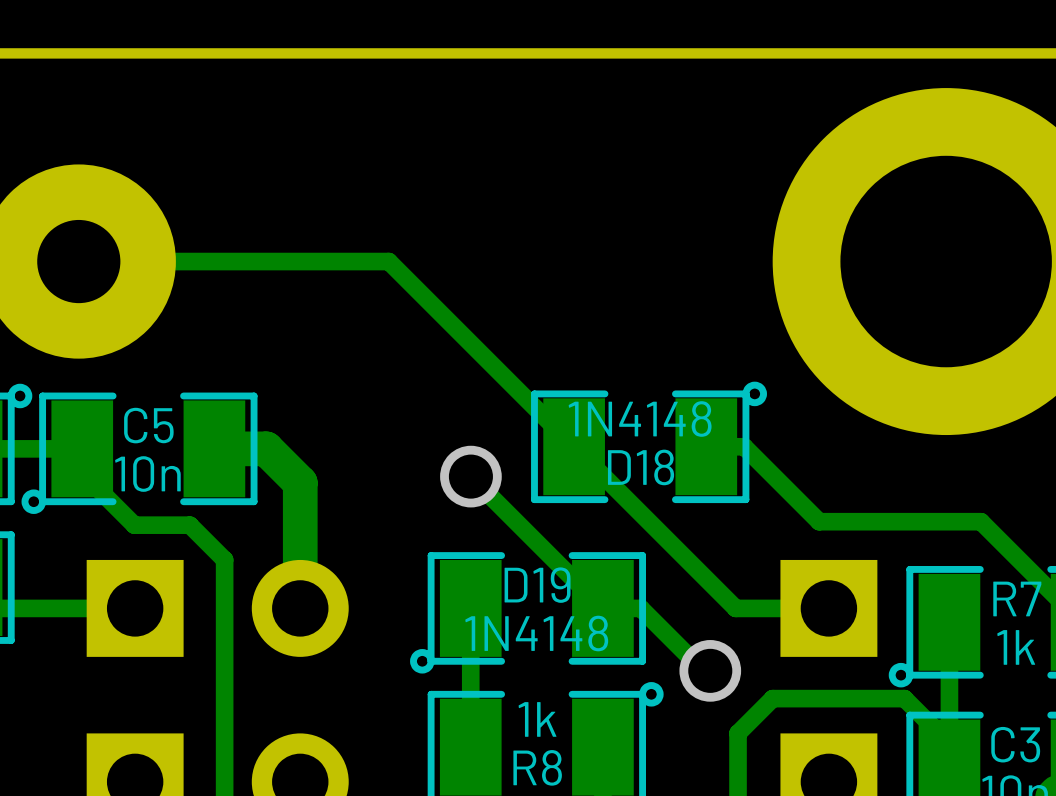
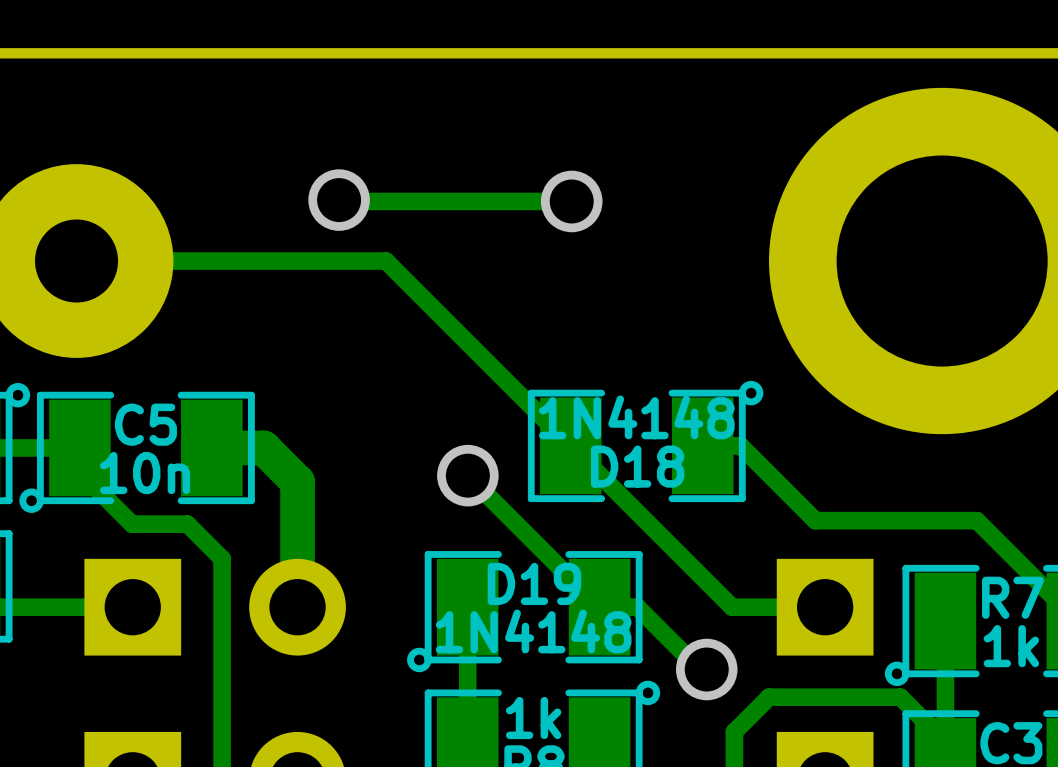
track: none -> (339, 200) (571, 201)
via: none -> (339, 200)
via: none -> (571, 201)

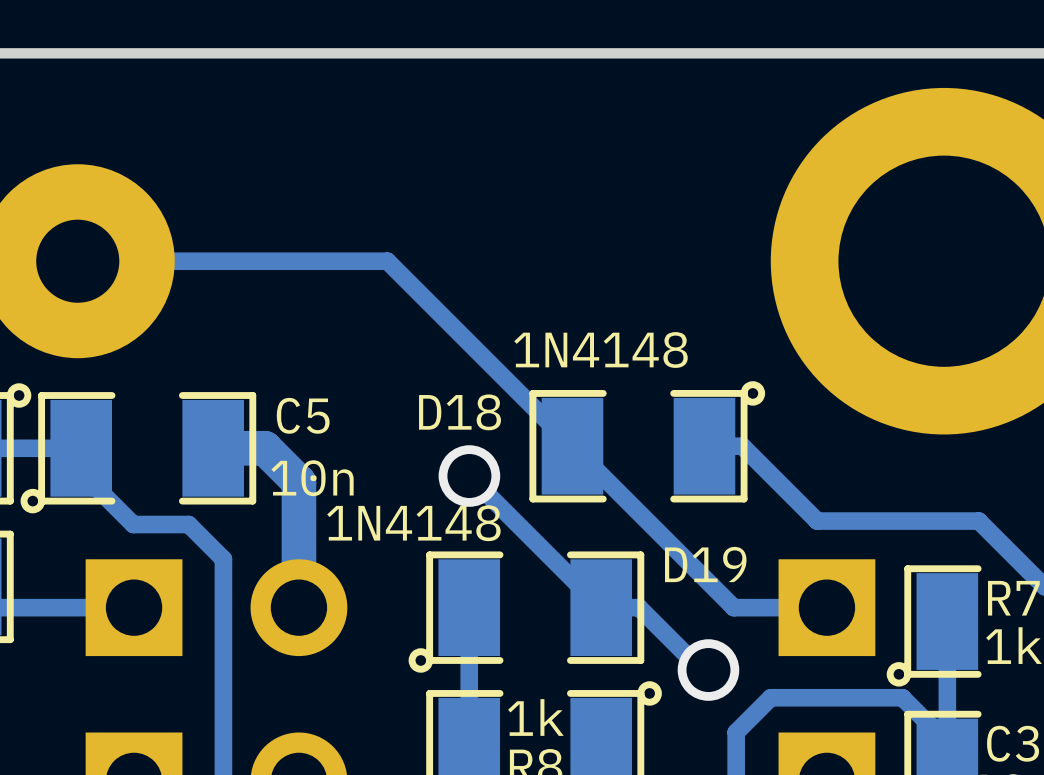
track: (339, 200) (571, 201) -> none
via: (339, 200) -> none
via: (571, 201) -> none
D18 value position: 1N4148 (636, 417) -> 1N4148 (601, 350)
C5 name position: C5 (145, 424) -> C5 (303, 415)
D18 name position: D18 (637, 466) -> D18 (460, 412)
C5 value position: 10n (145, 473) -> 10n (312, 478)
D19 name position: D19 (534, 583) -> D19 (705, 564)
D19 value position: 1N4148 (533, 631) -> 1N4148 (413, 523)

